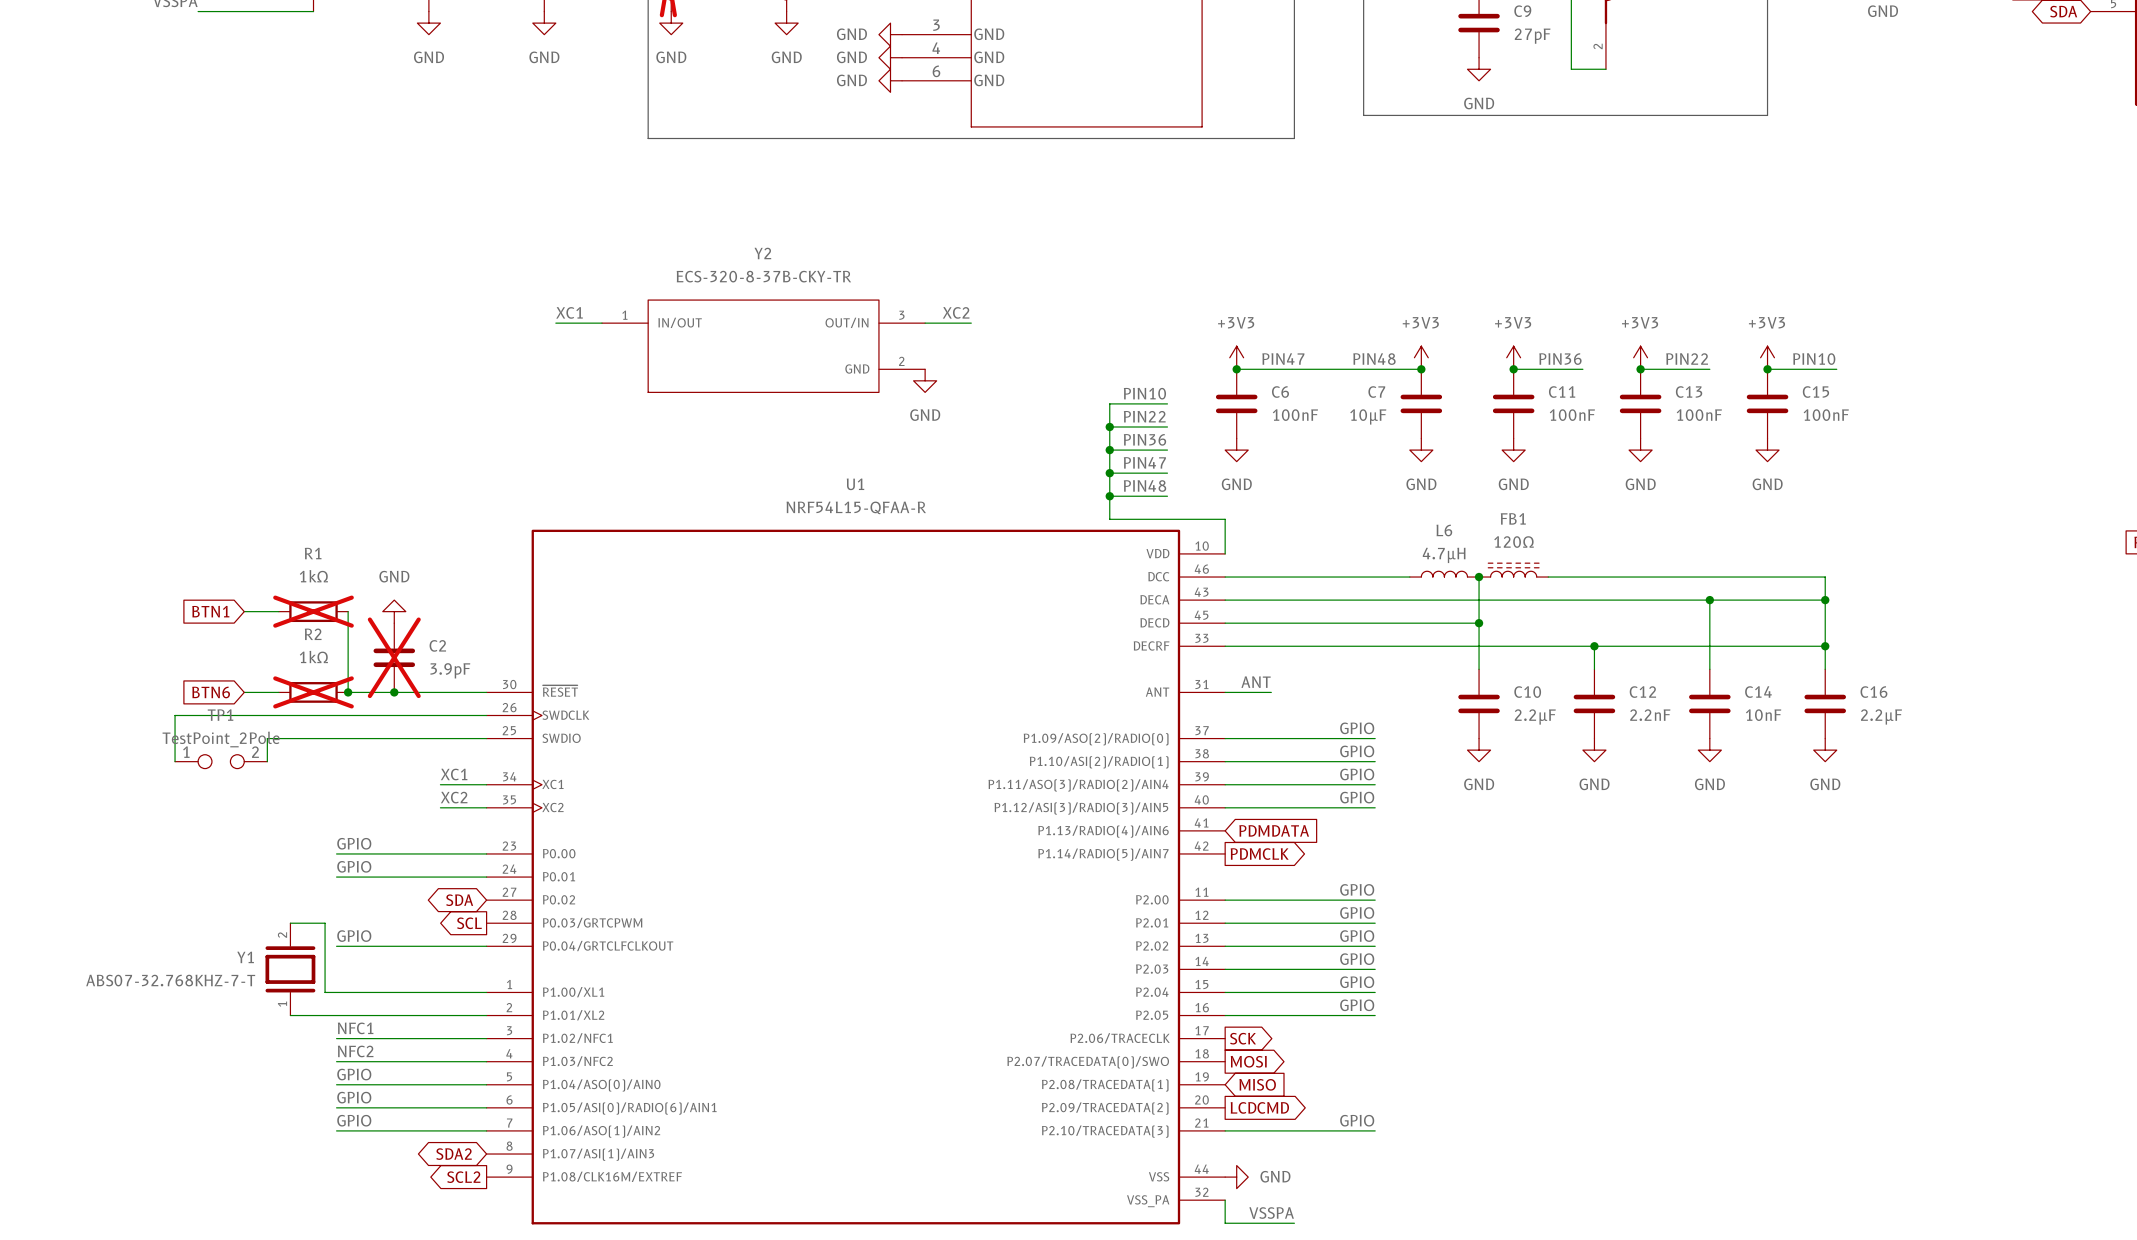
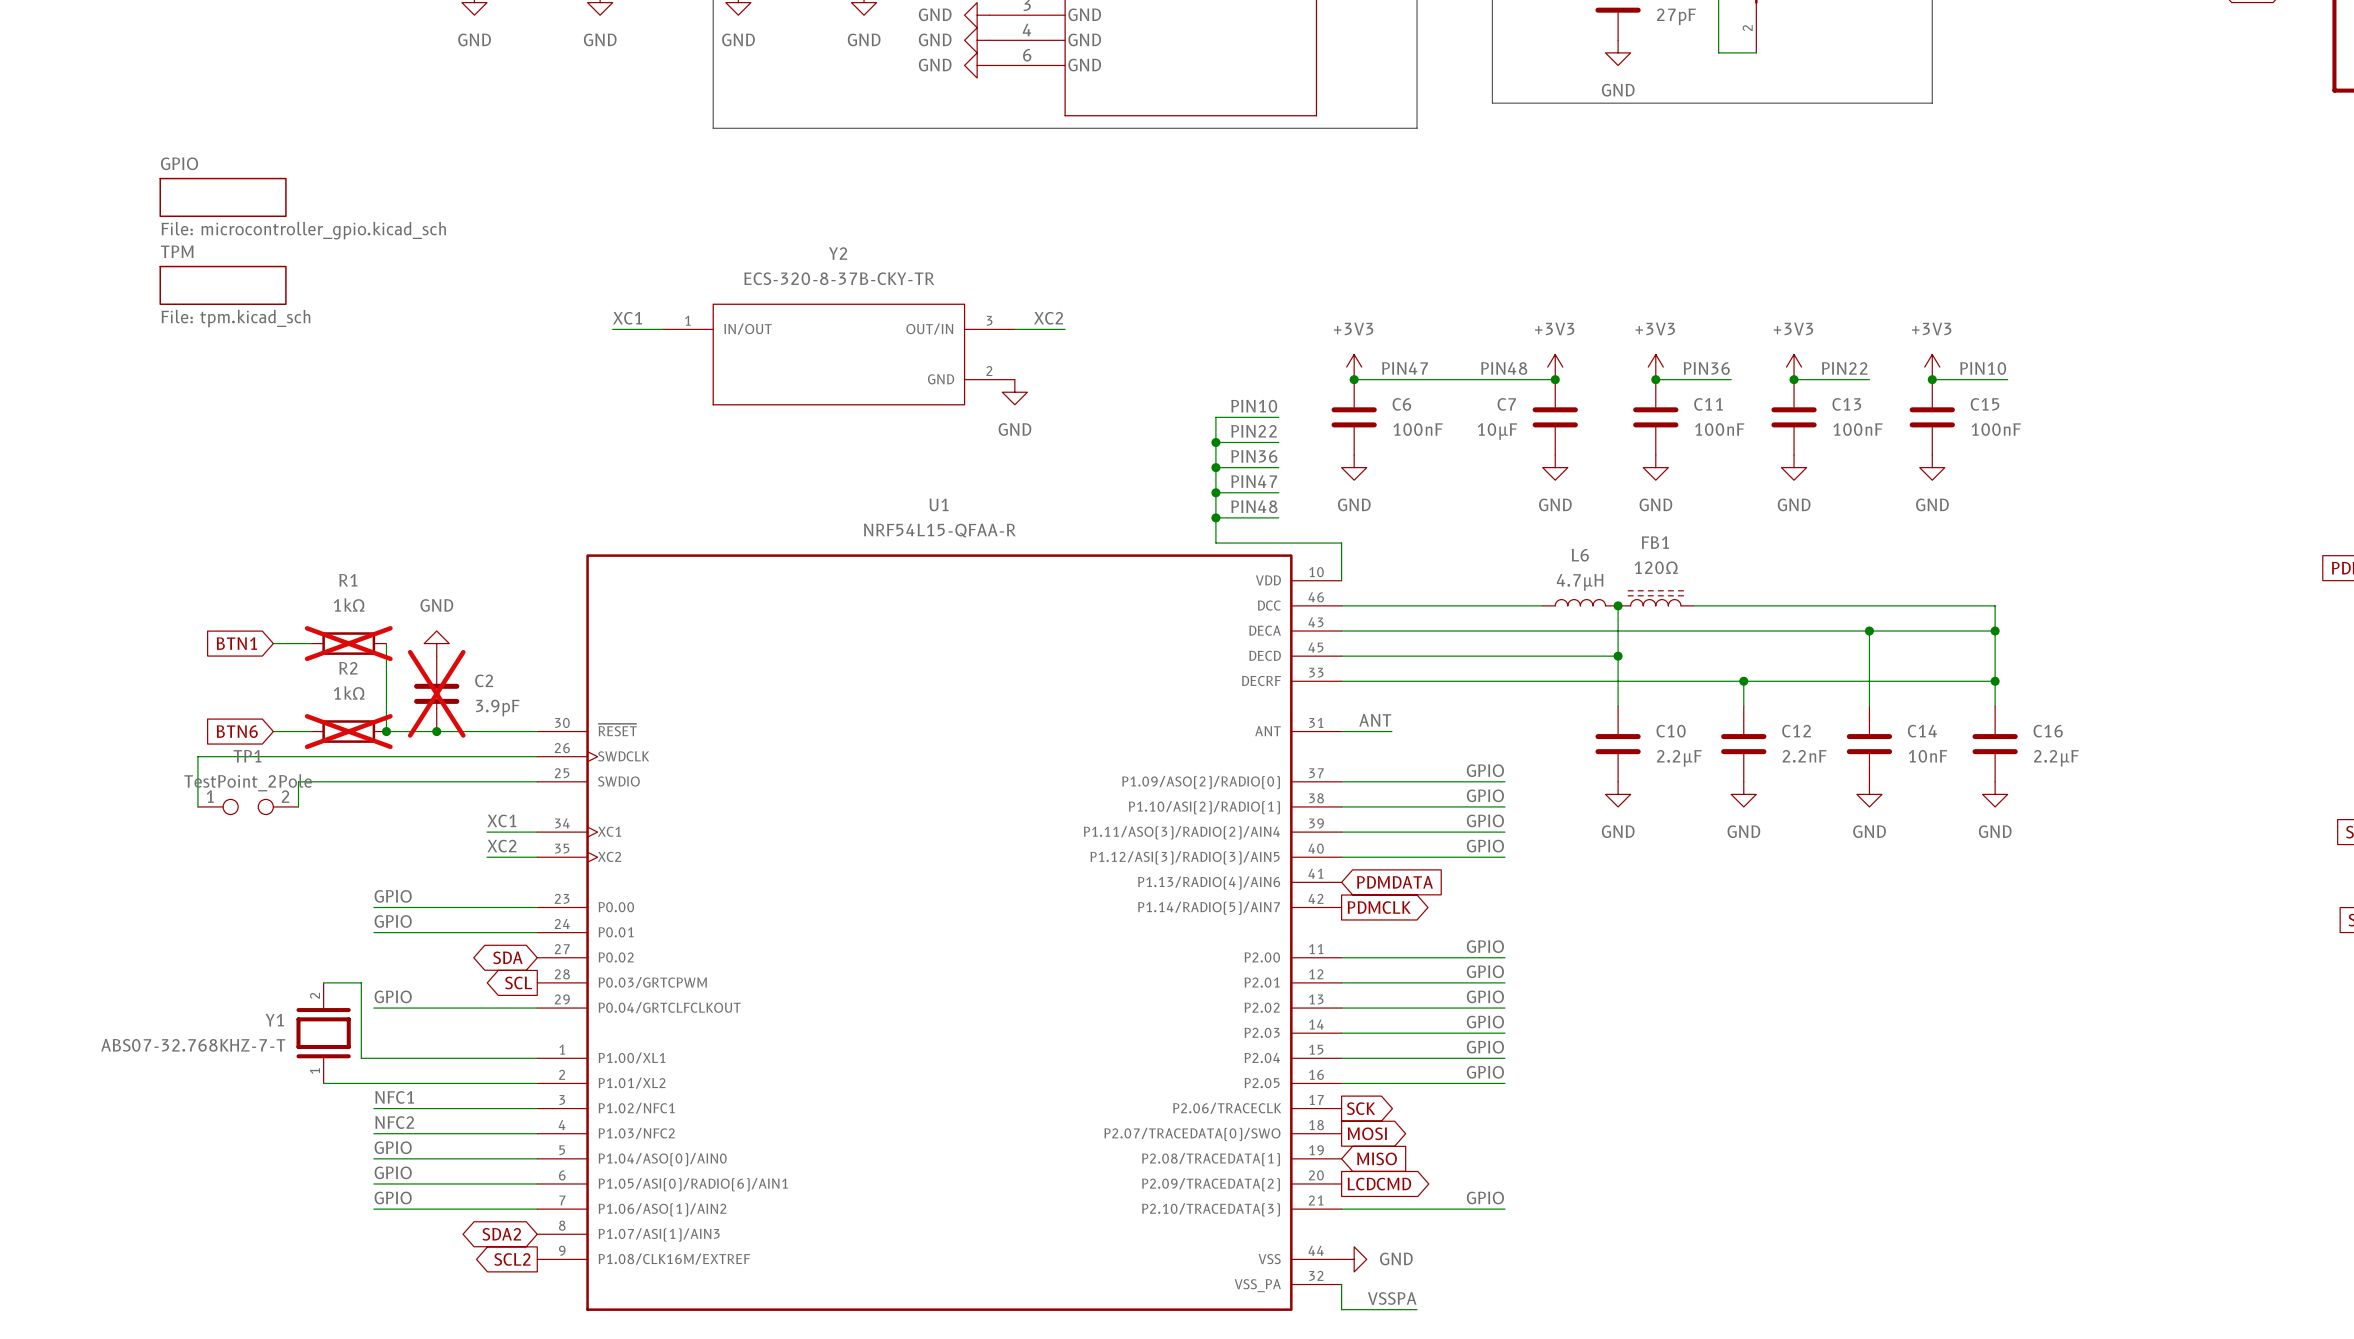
sheet GPIO: none -> File: microcontroller_gpio.kicad_sch (223, 197)
sheet TPM: none -> File: tpm.kicad_sch (223, 285)

